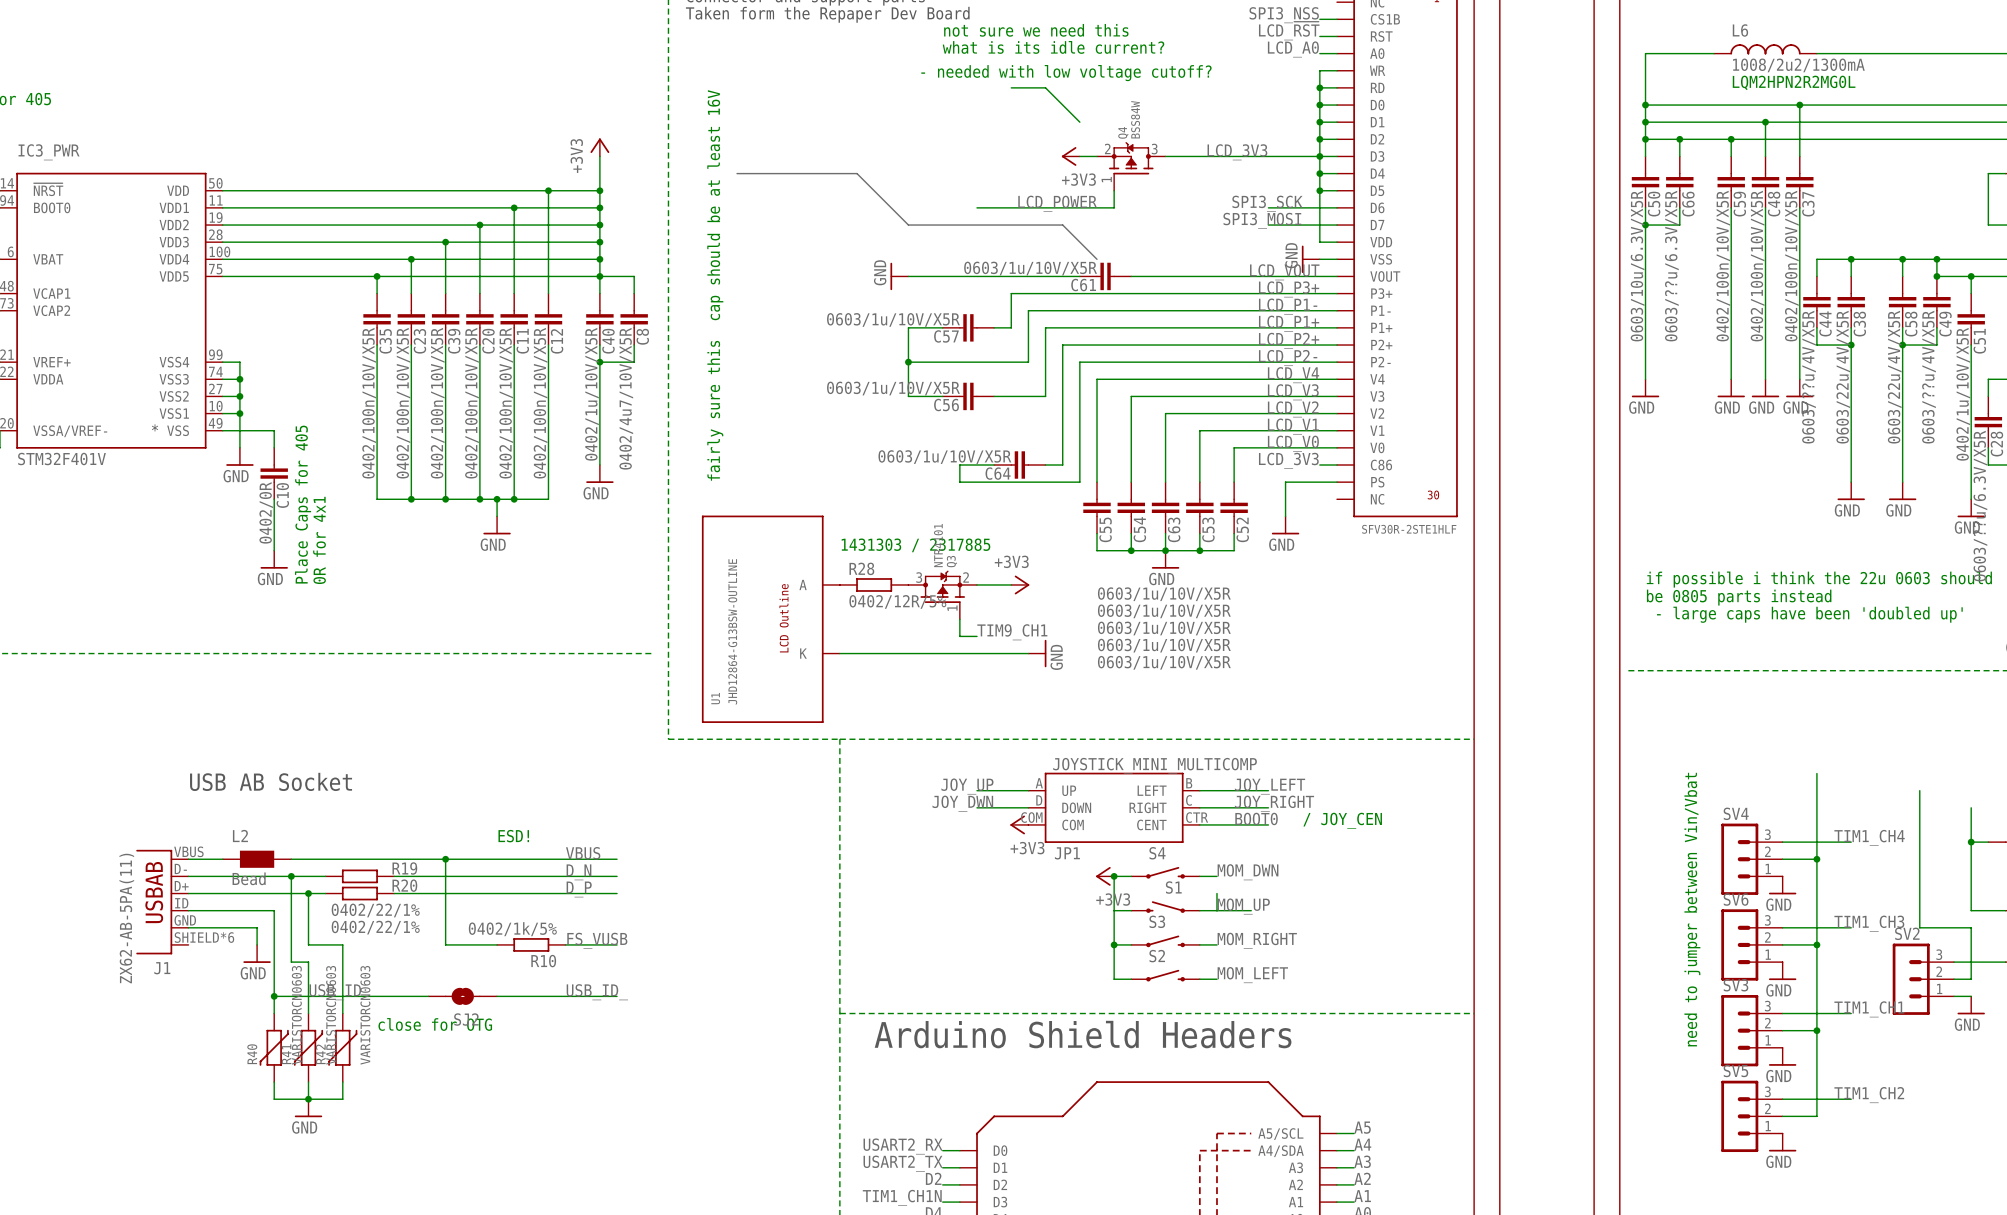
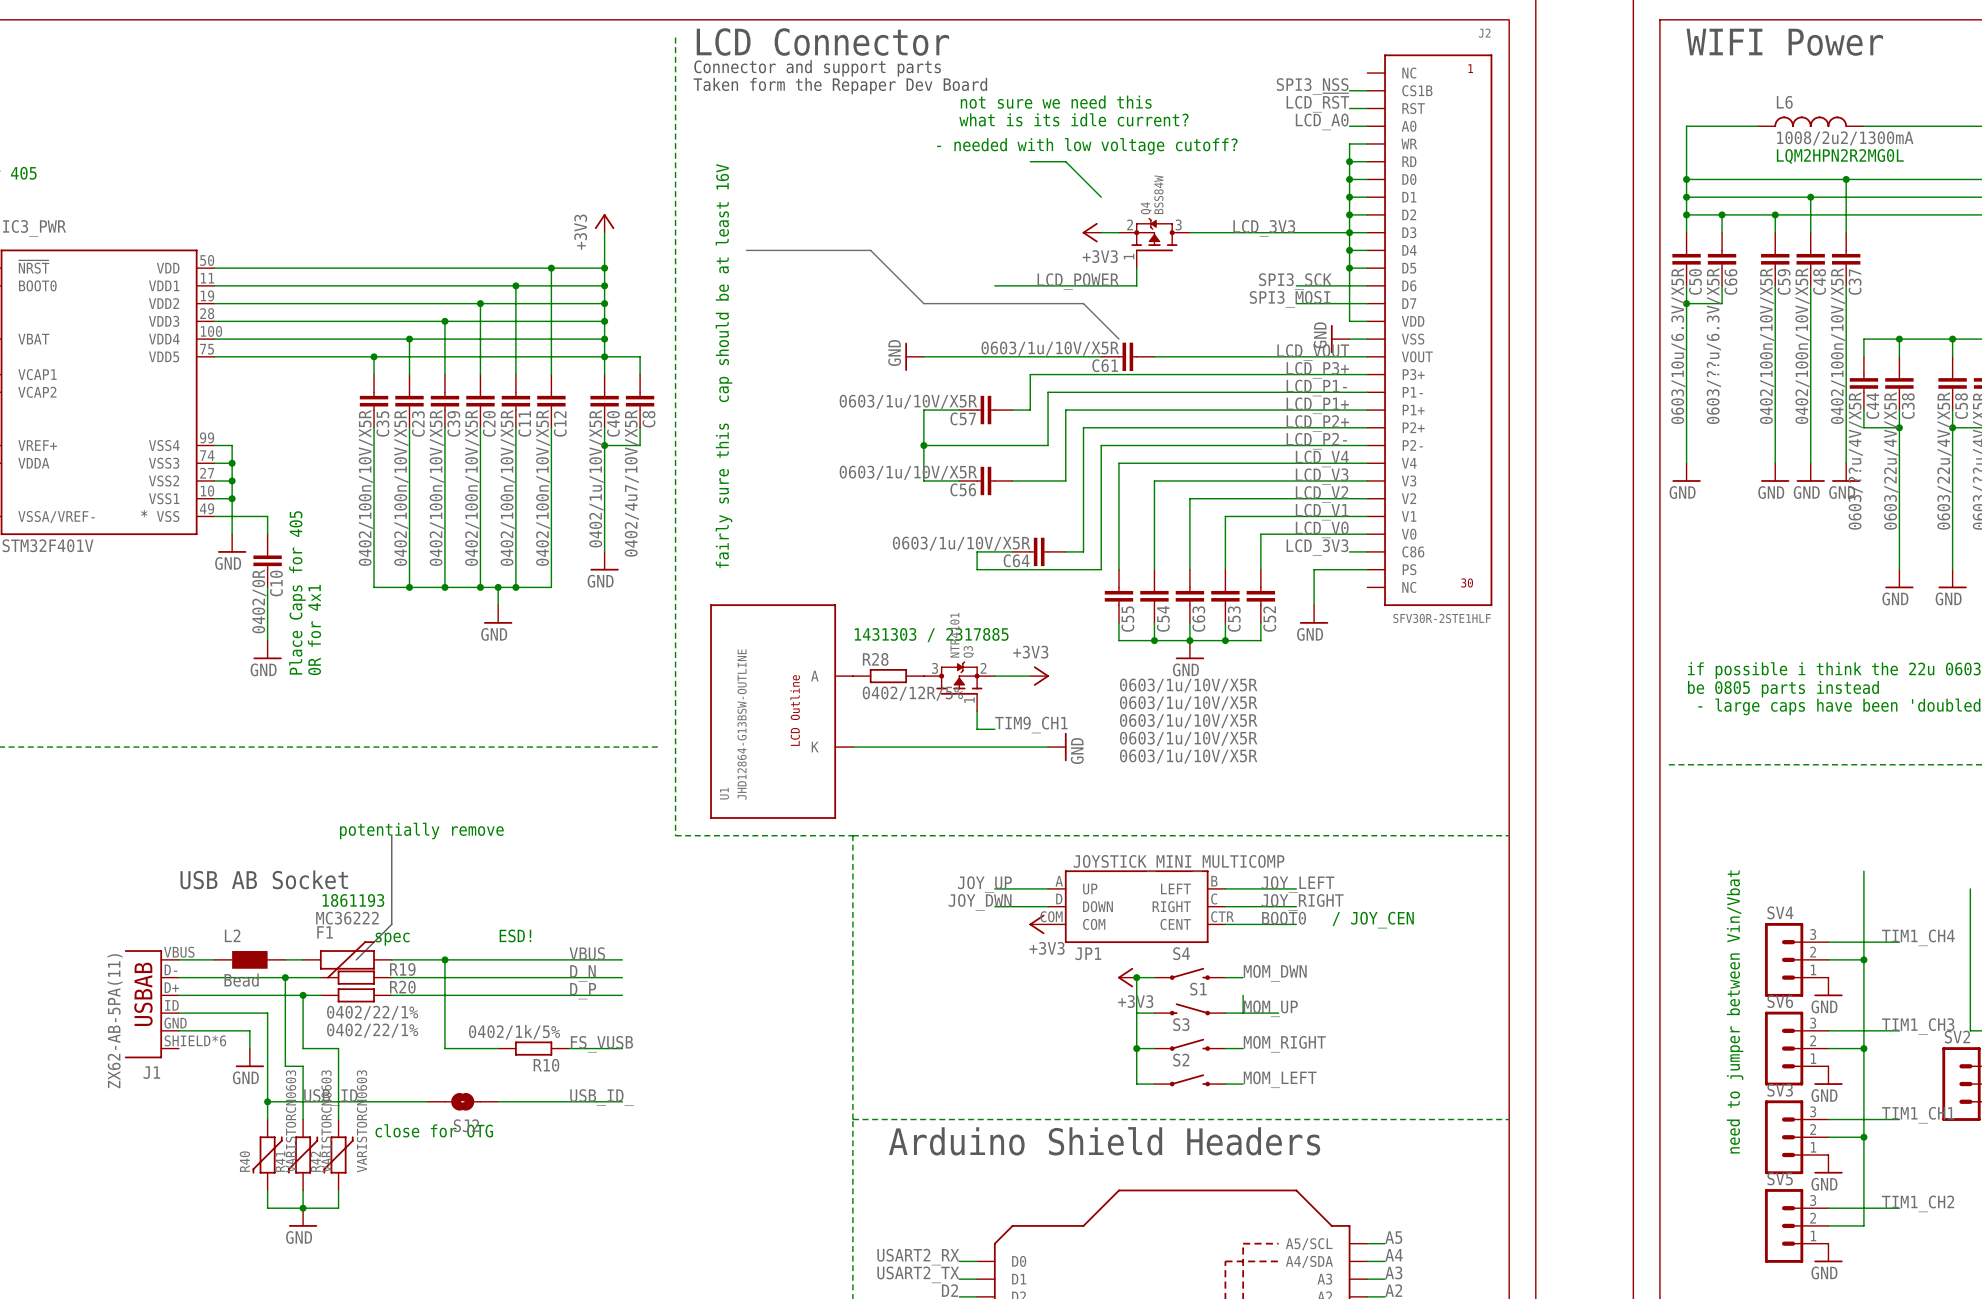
text: none -> potentially remove (421, 830)
line: none -> (391, 835) (391, 924) (356, 959)
text: none -> 1861193 (353, 900)
text: none -> spec (392, 939)
wire: (308, 859) (394, 859) -> none
F1: none -> MC36222 (347, 959)

